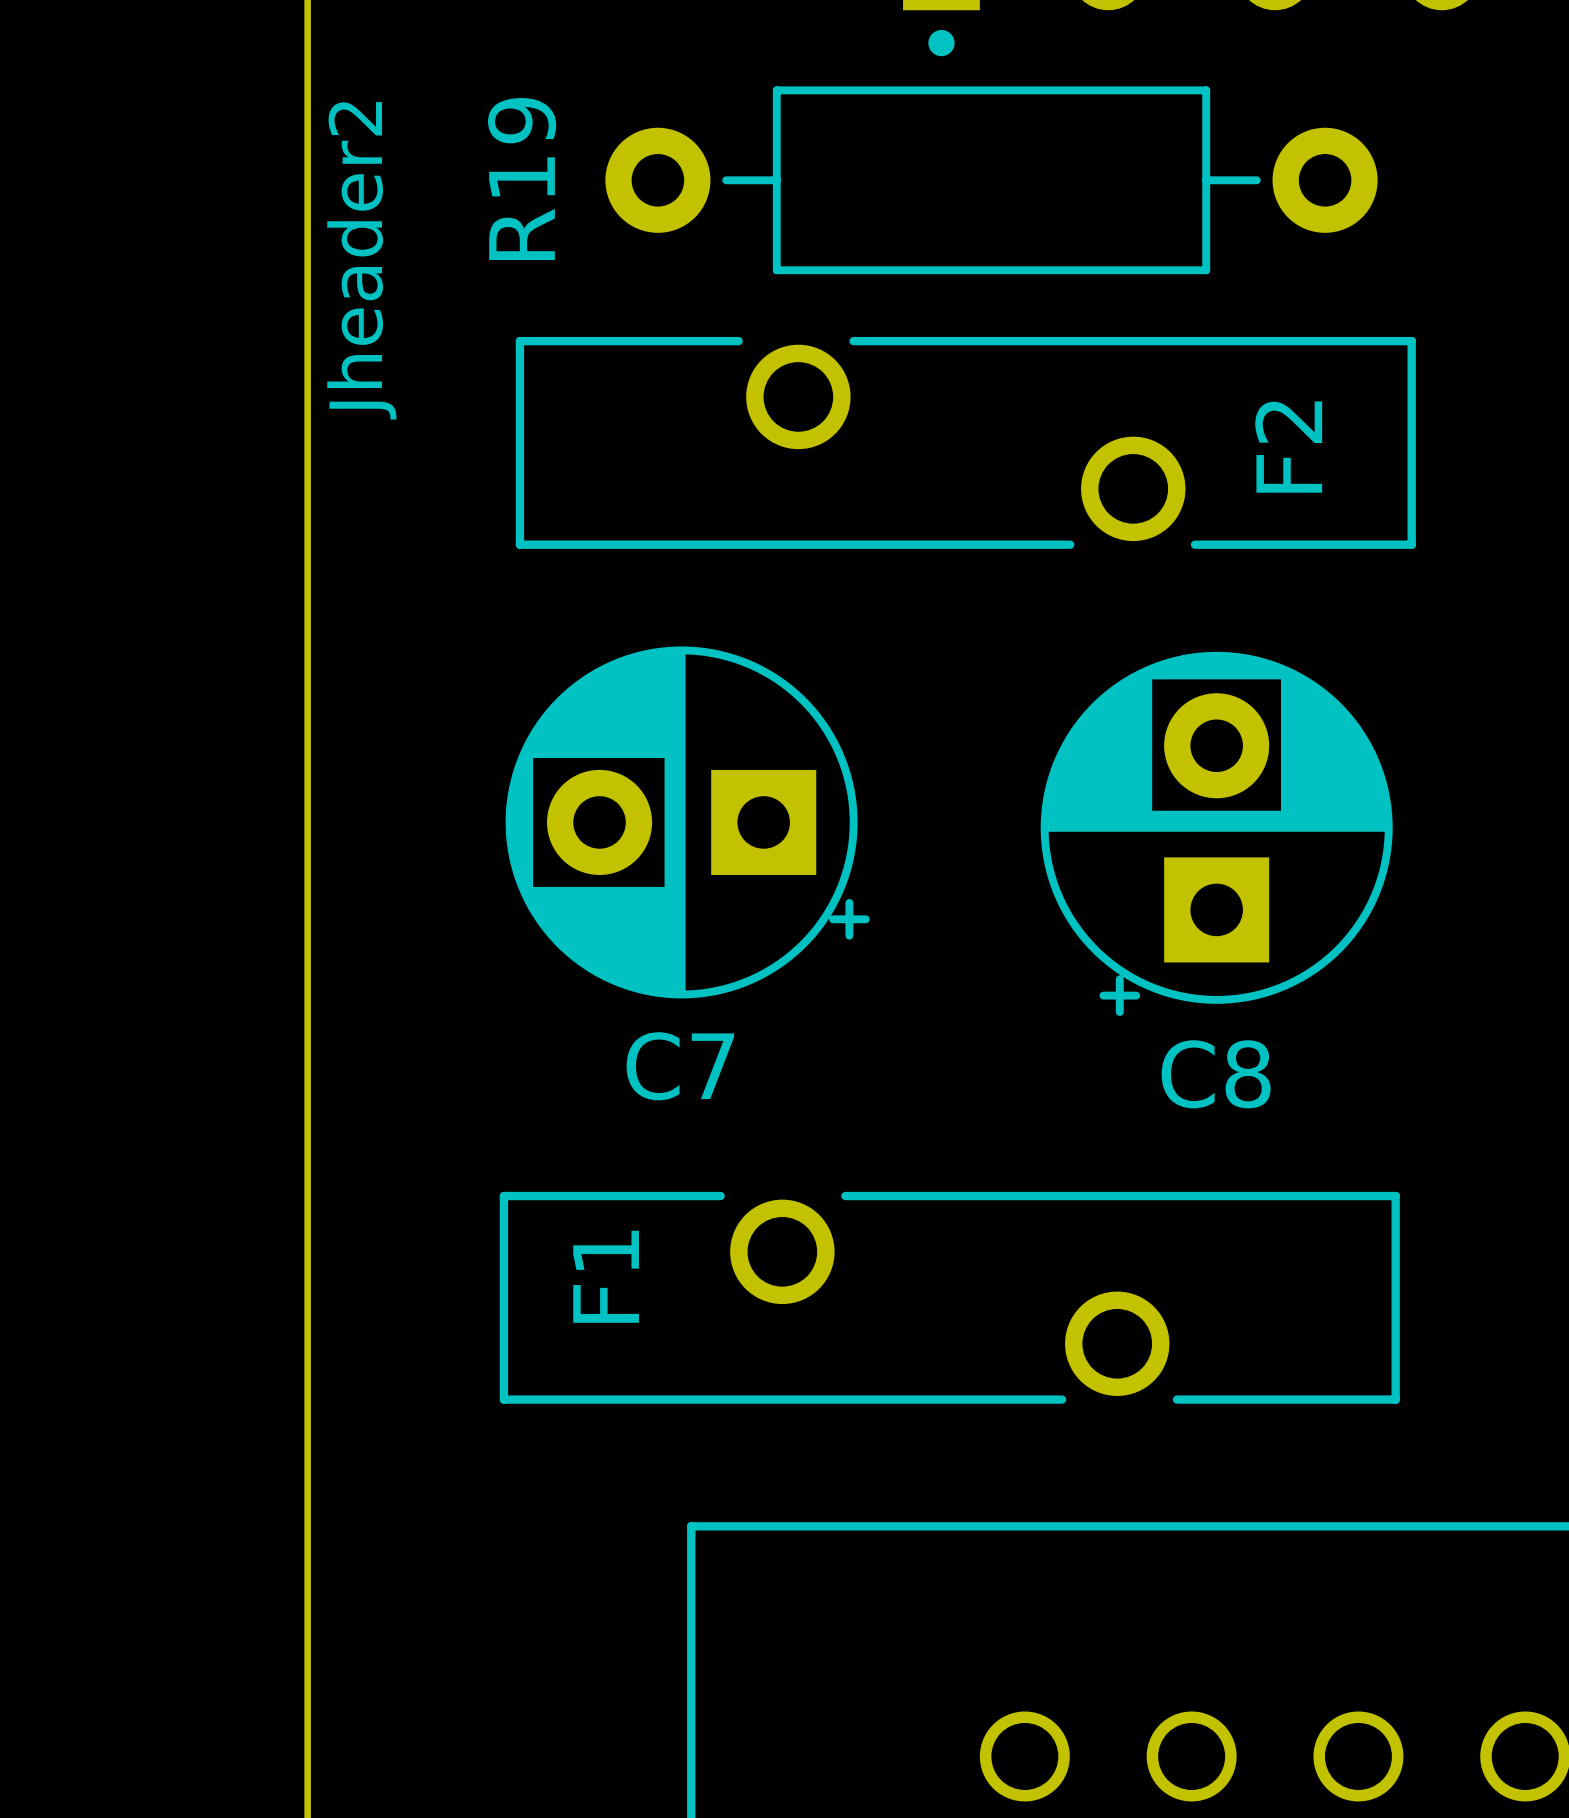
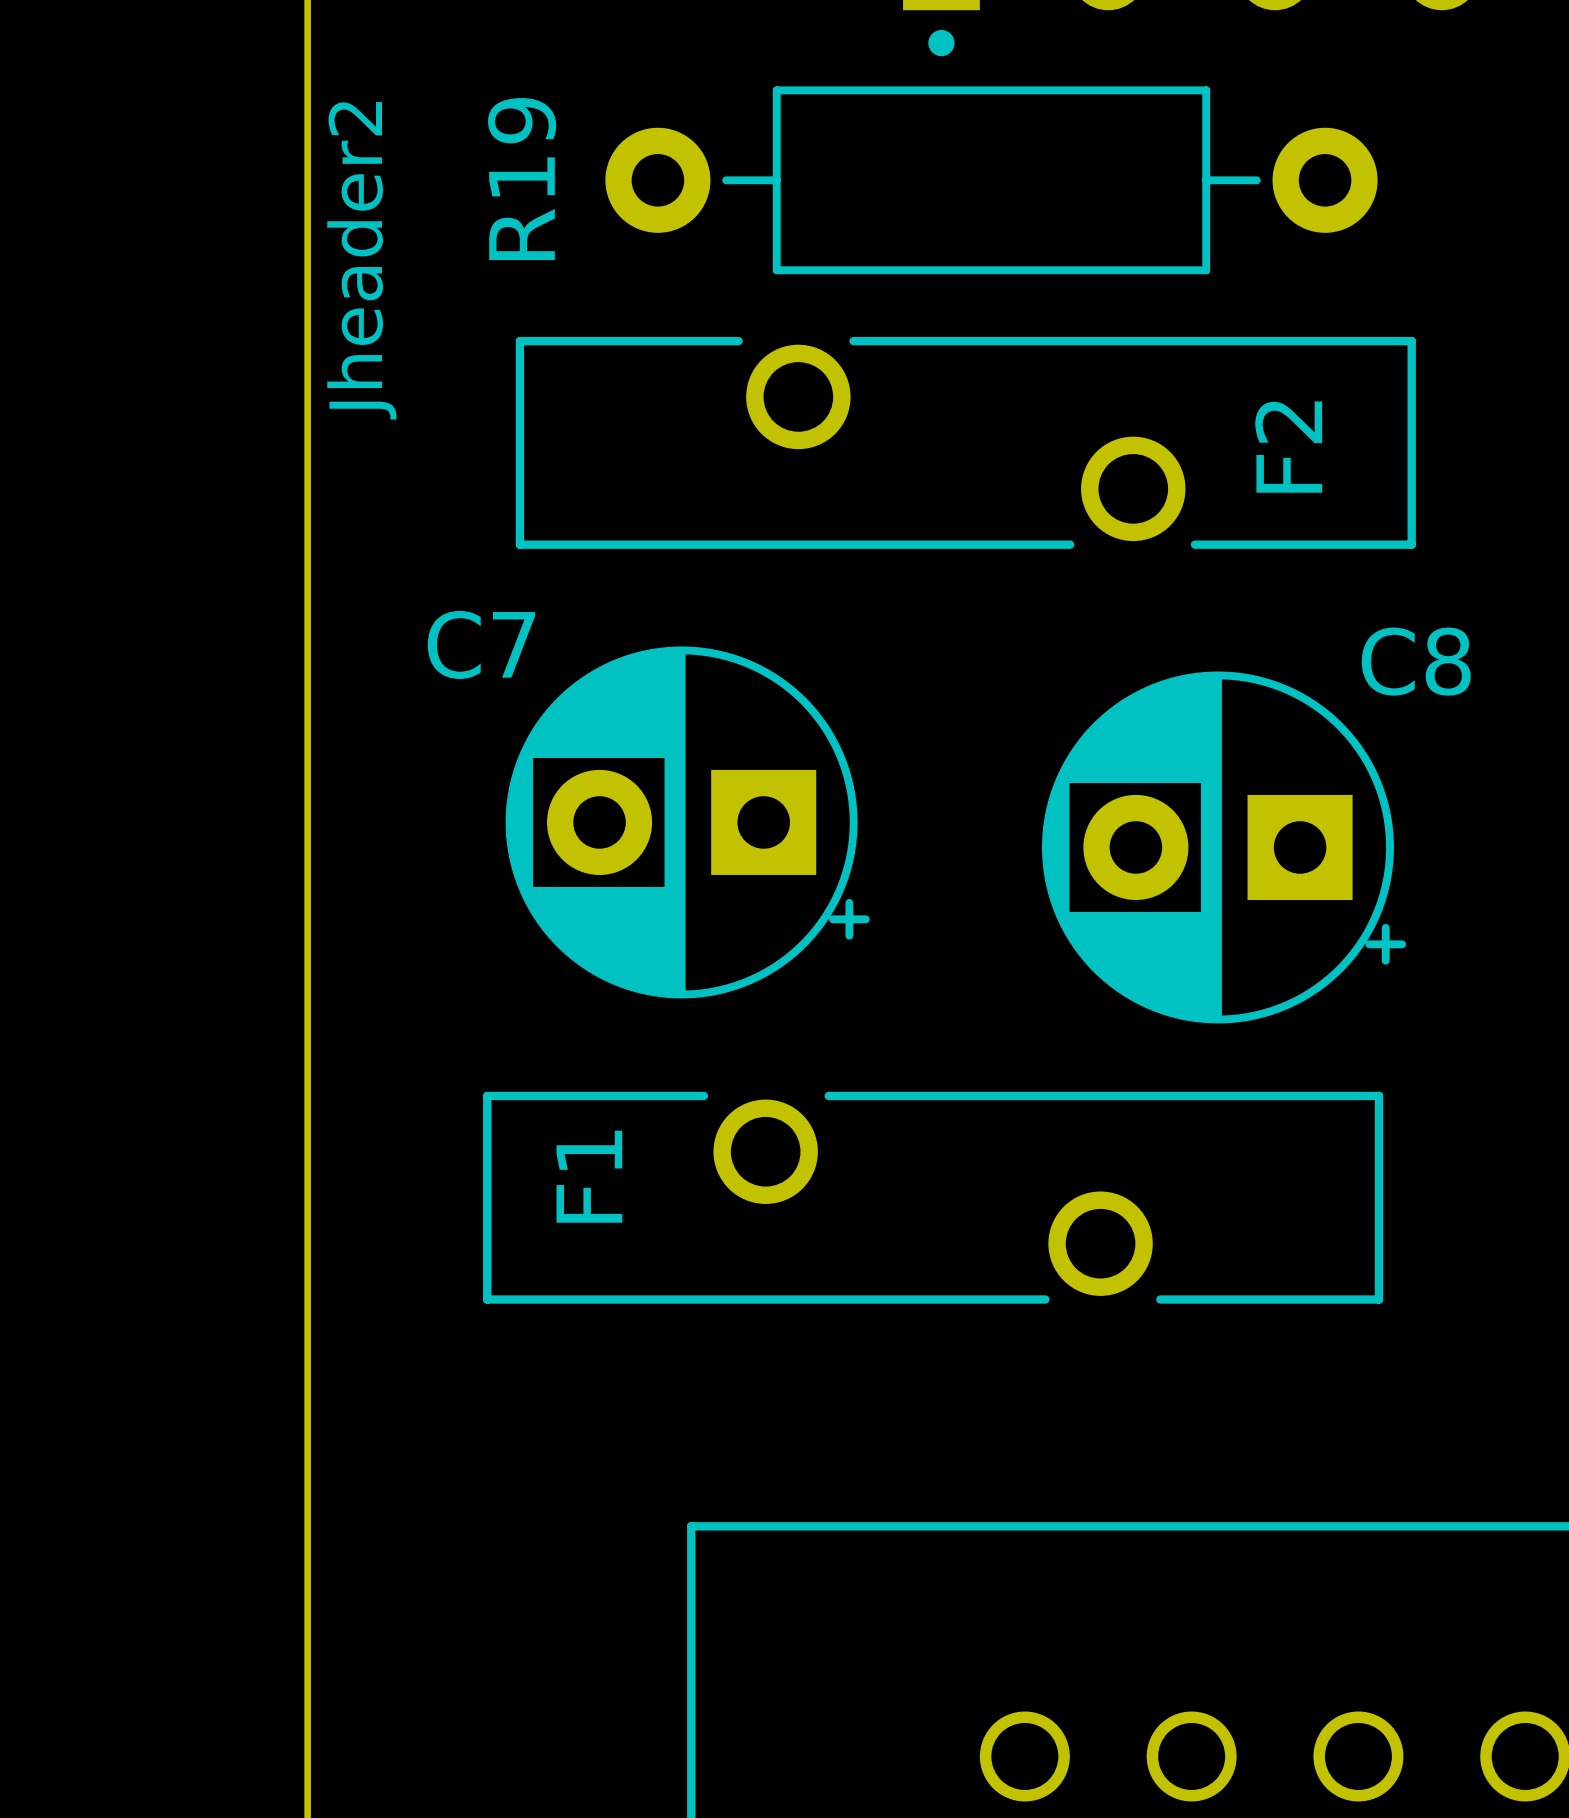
C8 rotation: 0° (1216, 833) -> 90° counterclockwise (1224, 847)
C7 name position: C7 (680, 1066) -> C7 (481, 644)
C8 name position: C8 (1216, 1074) -> C8 (1416, 661)
F1 position: (949, 1297) -> (933, 1197)

